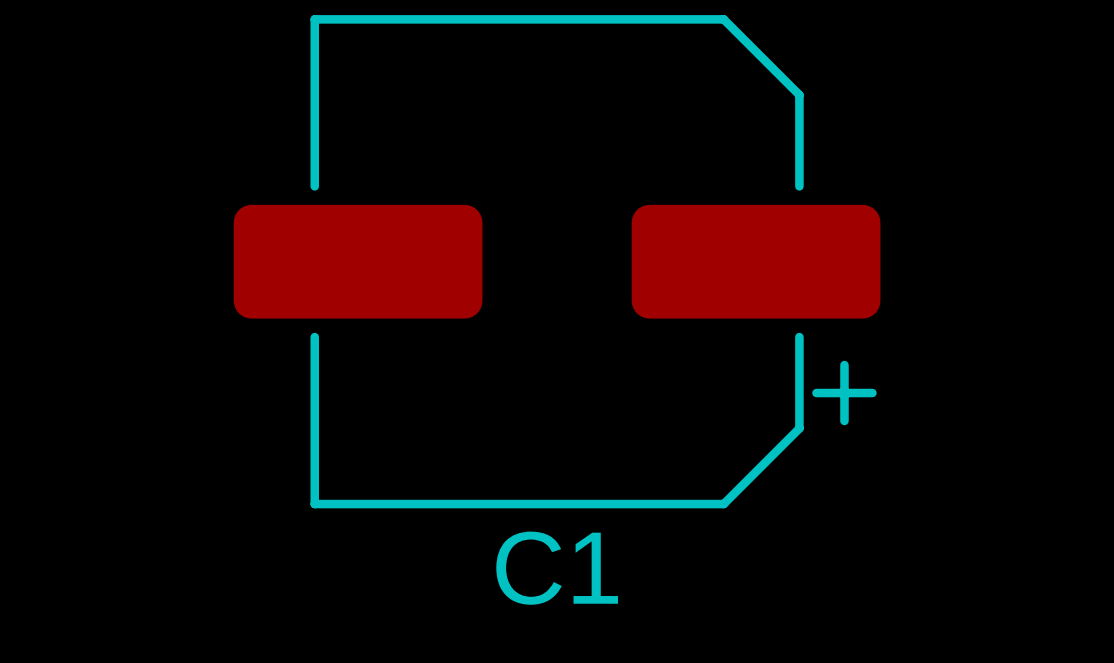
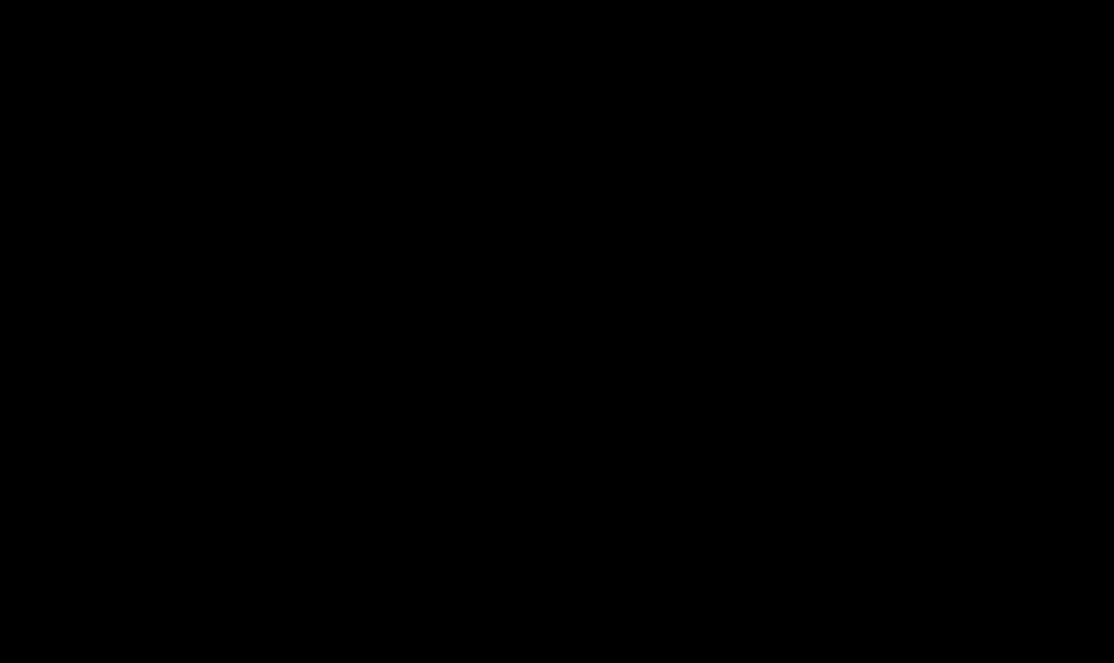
C1: (557, 261) -> none

